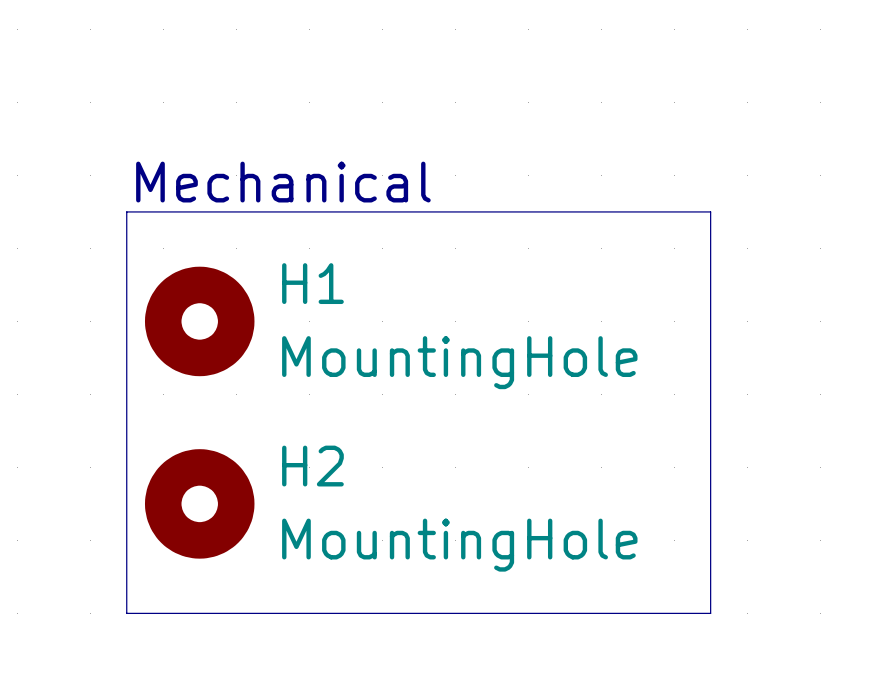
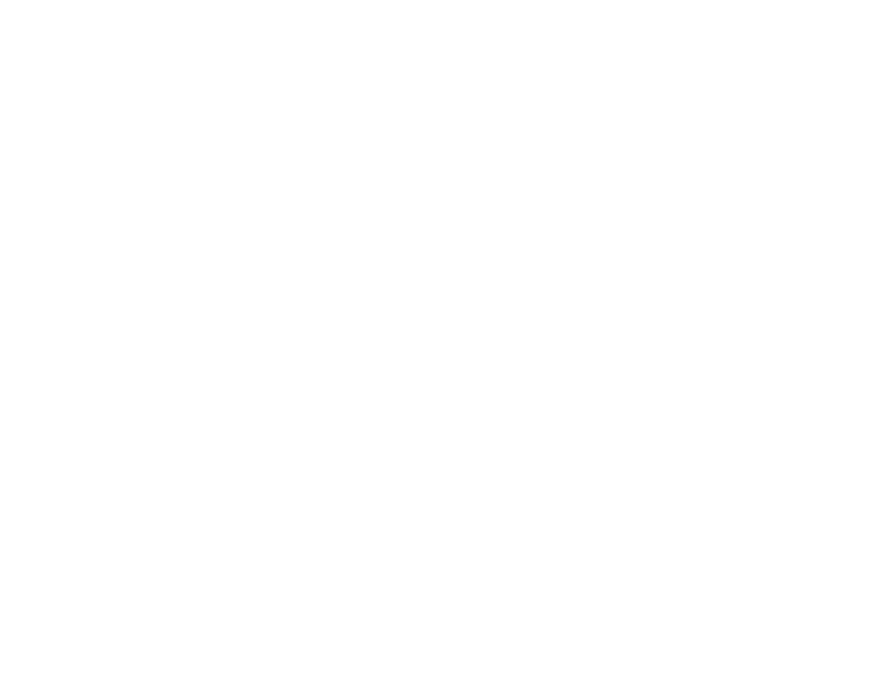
text: Mechanical (283, 182) -> none
line: (126, 211) (710, 211) (710, 613) (126, 613) (126, 211) -> none
H1: MountingHole (199, 321) -> none
H2: MountingHole (199, 503) -> none

